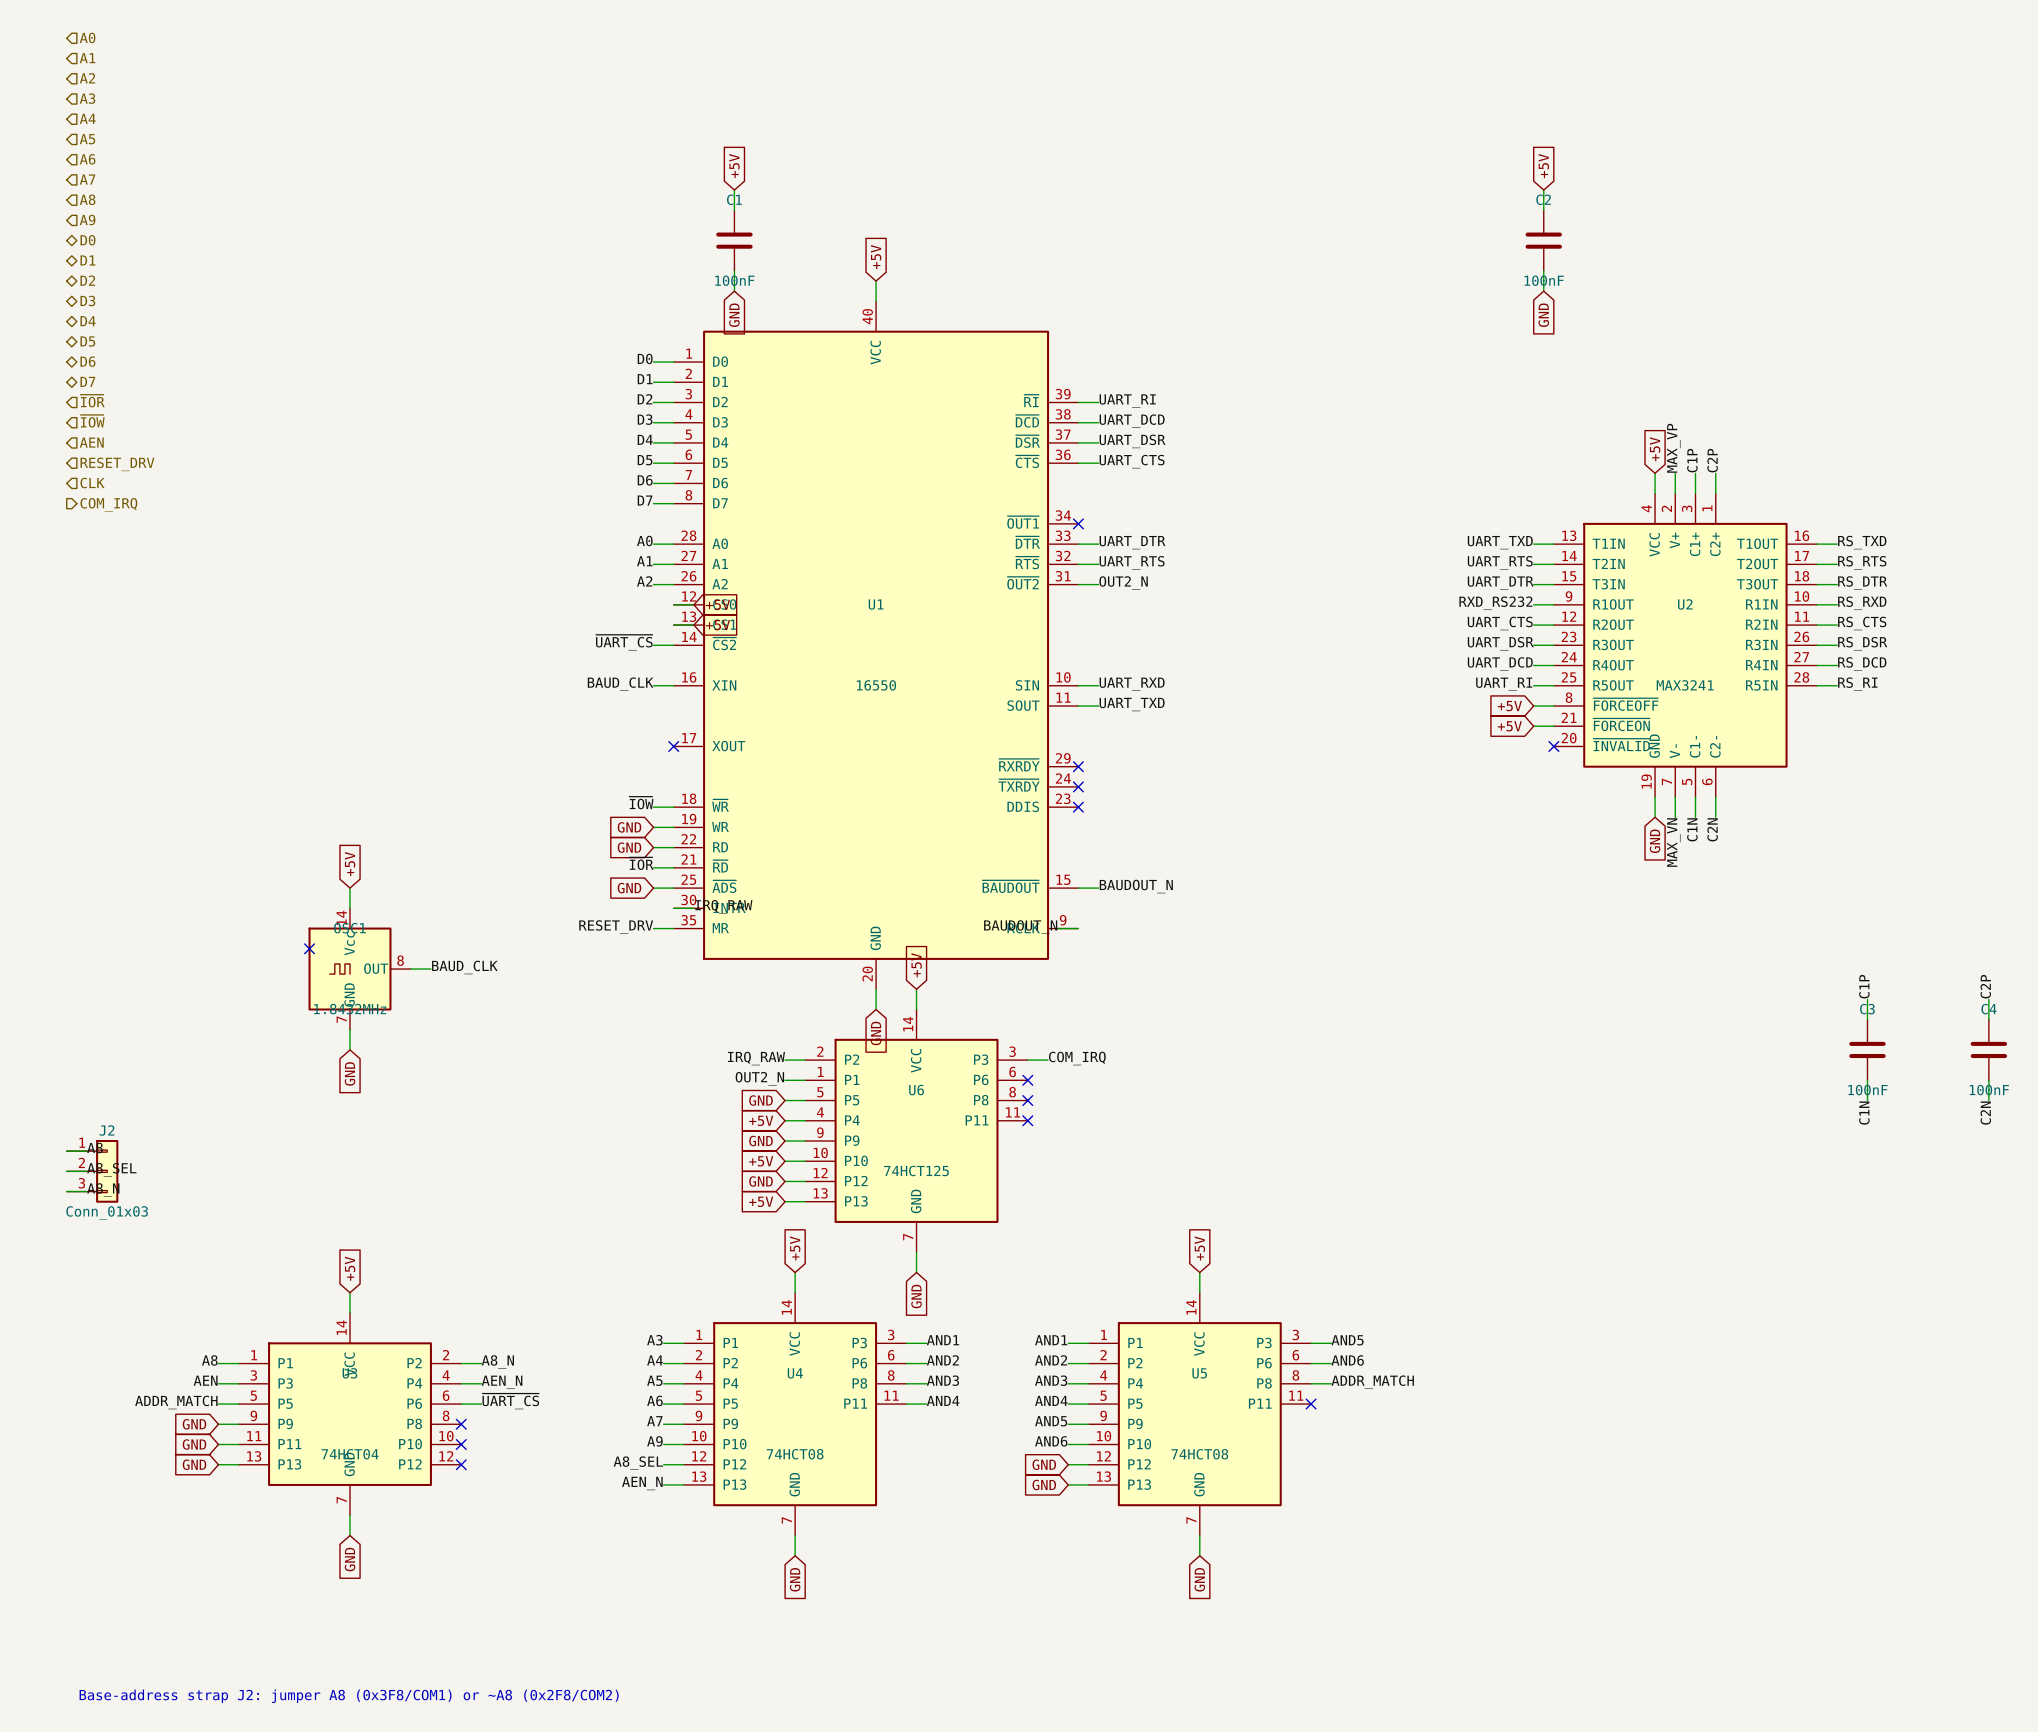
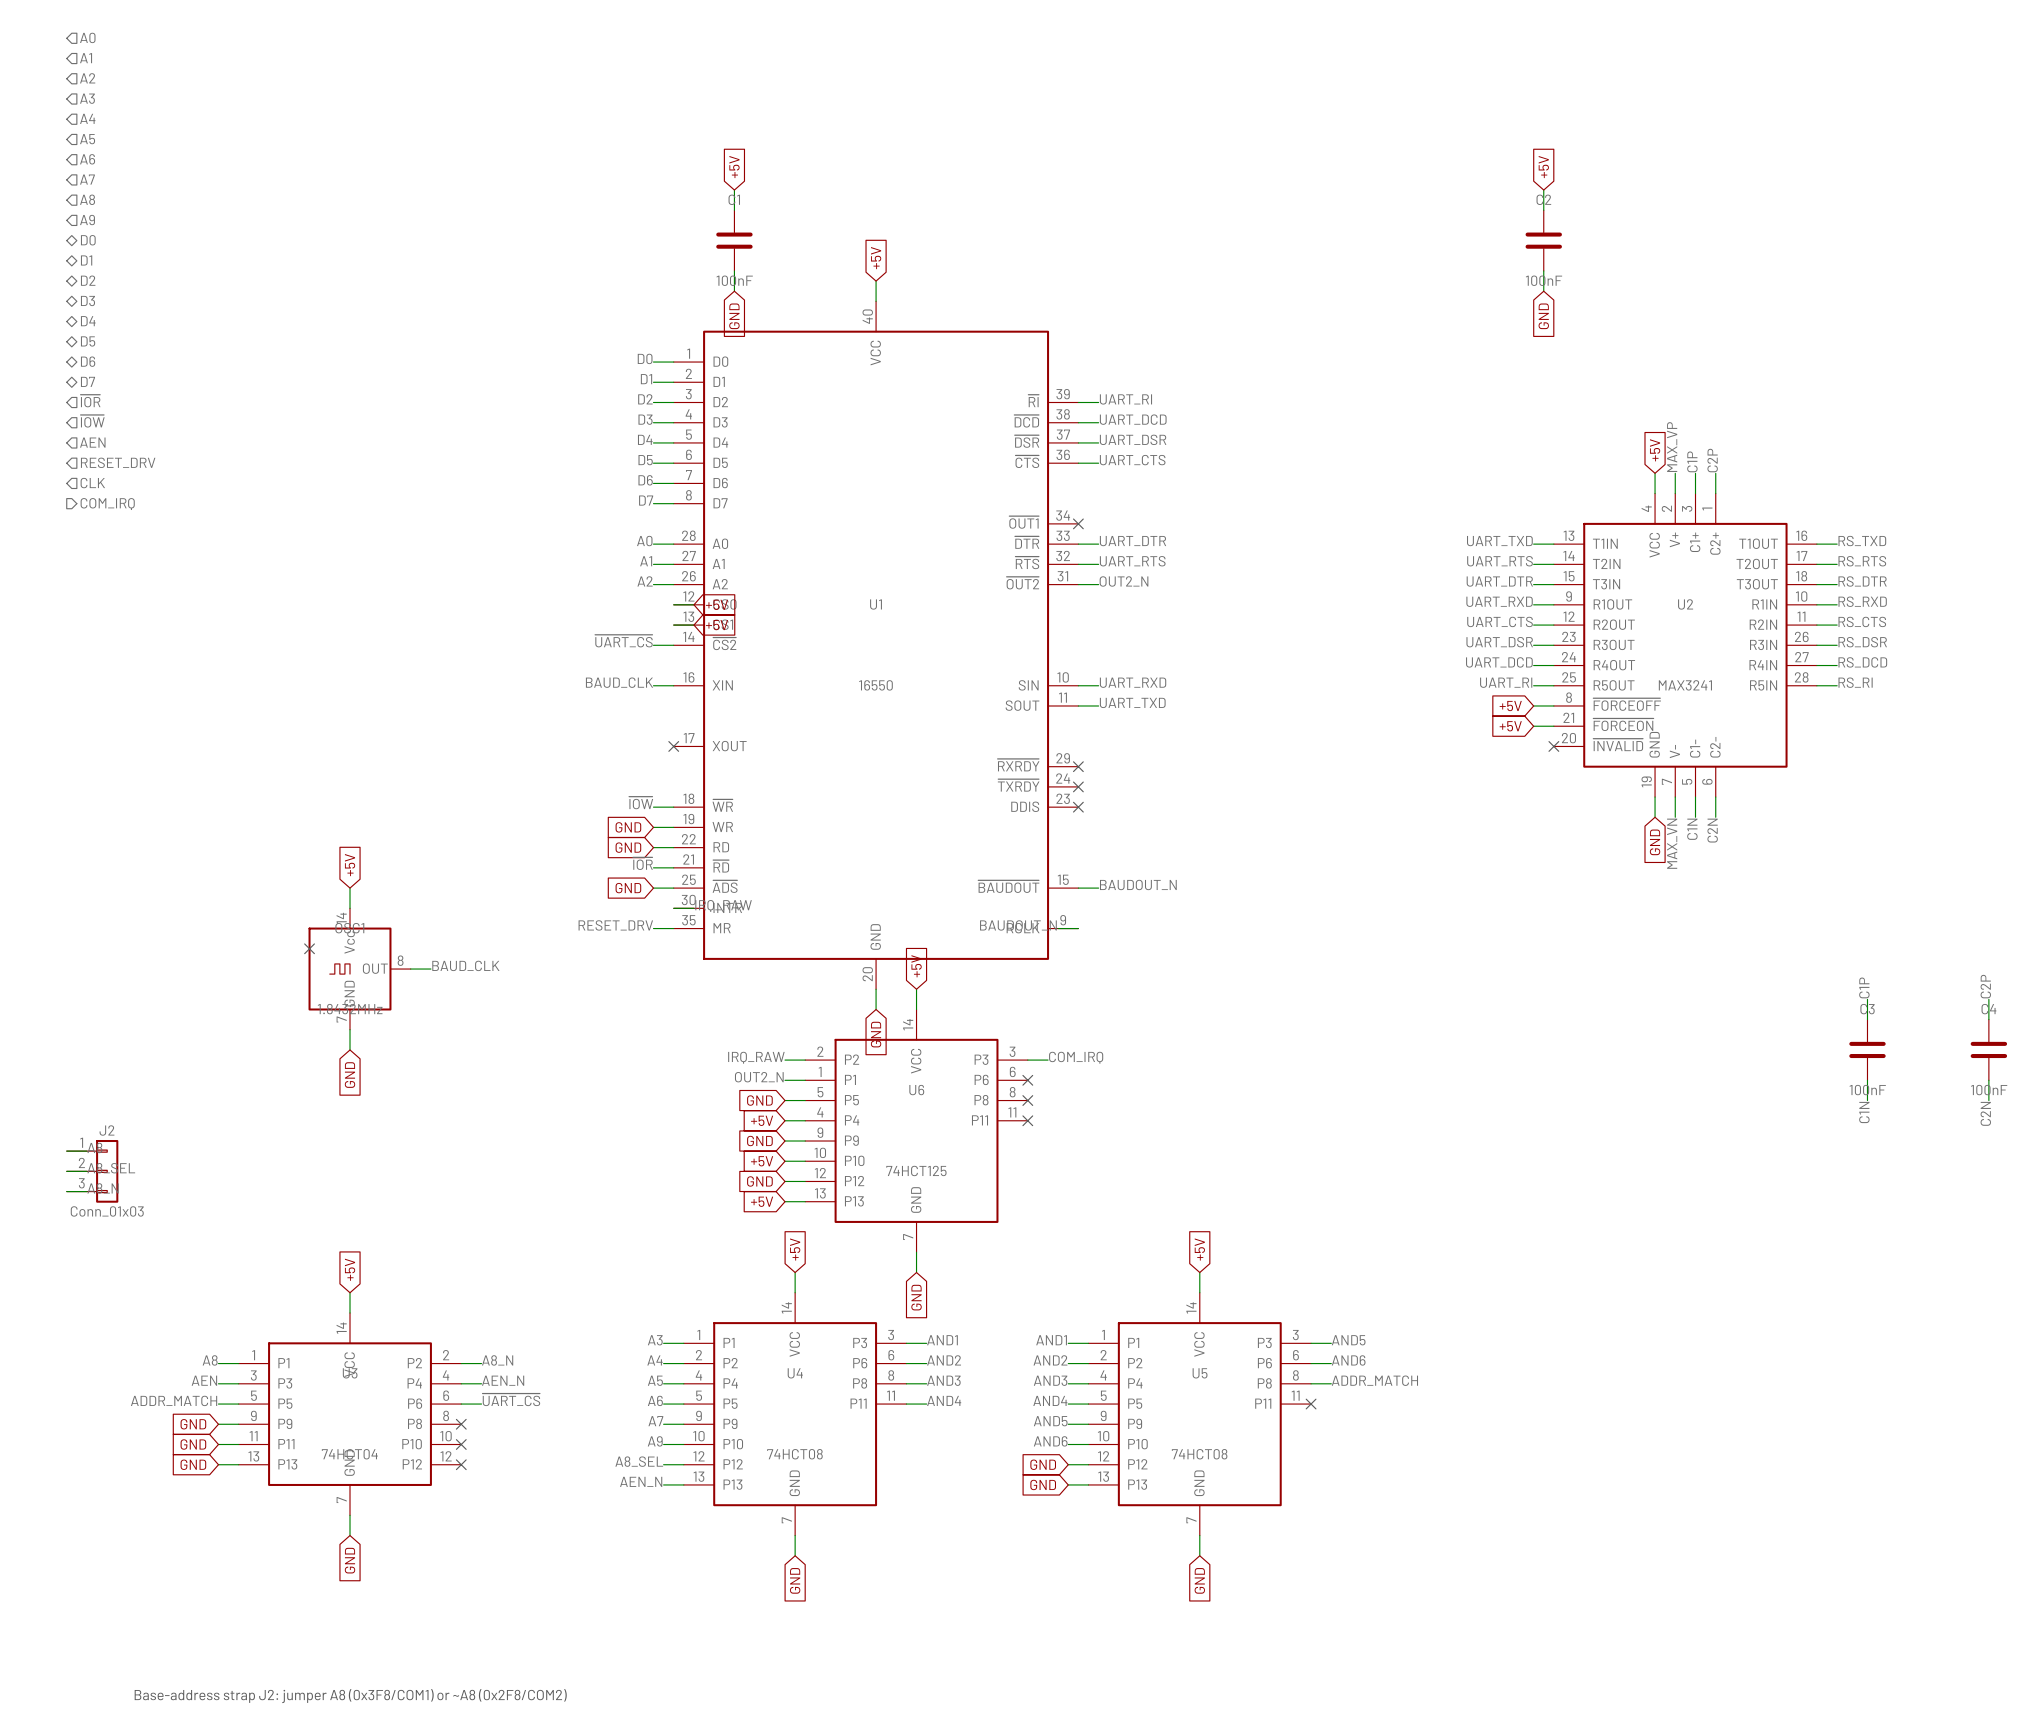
label: RXD_RS232 (1495, 603) -> UART_RXD (1499, 601)

